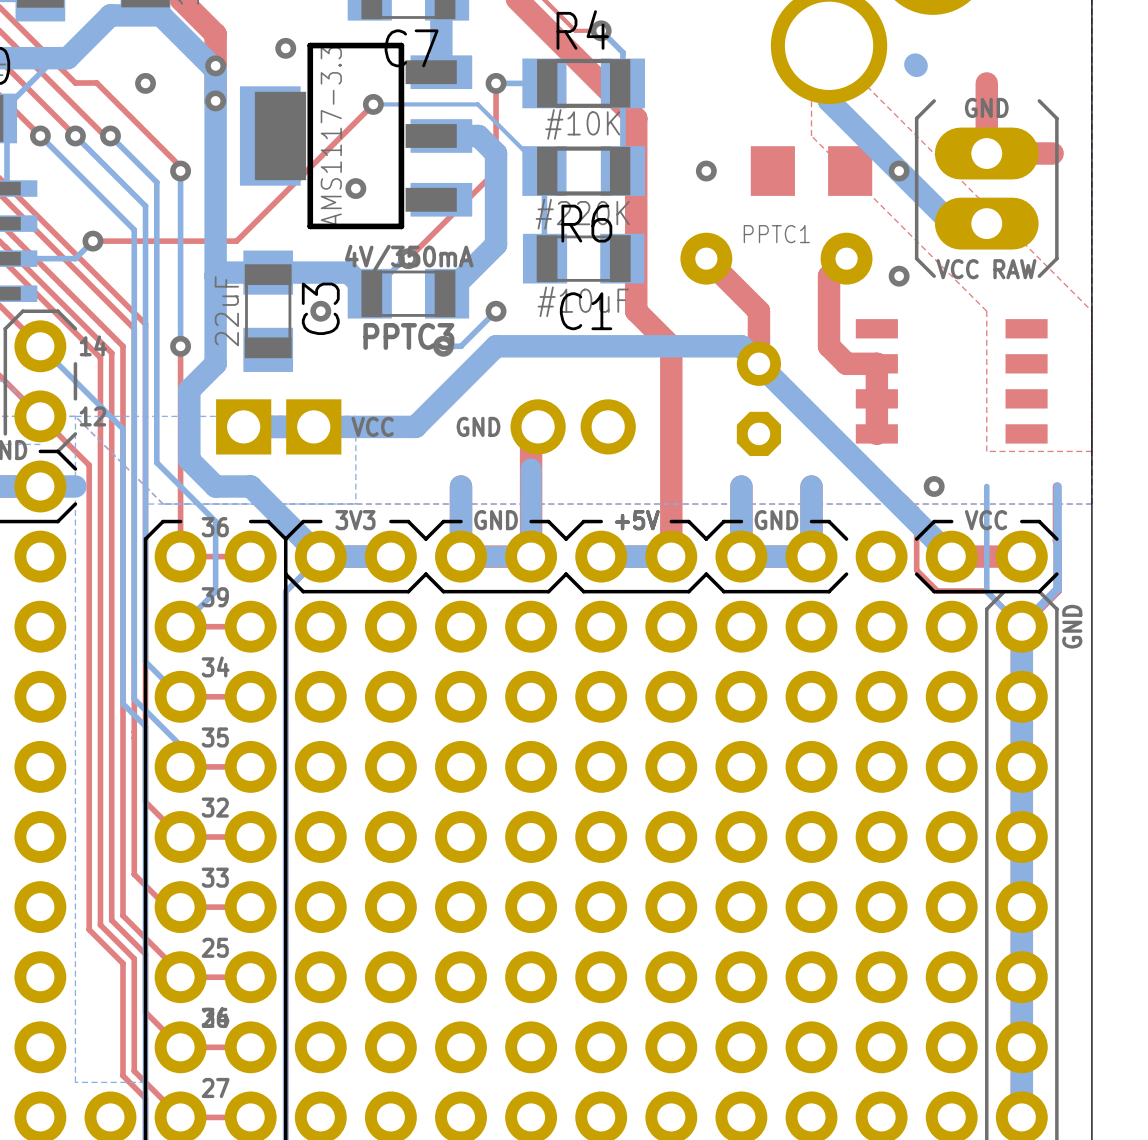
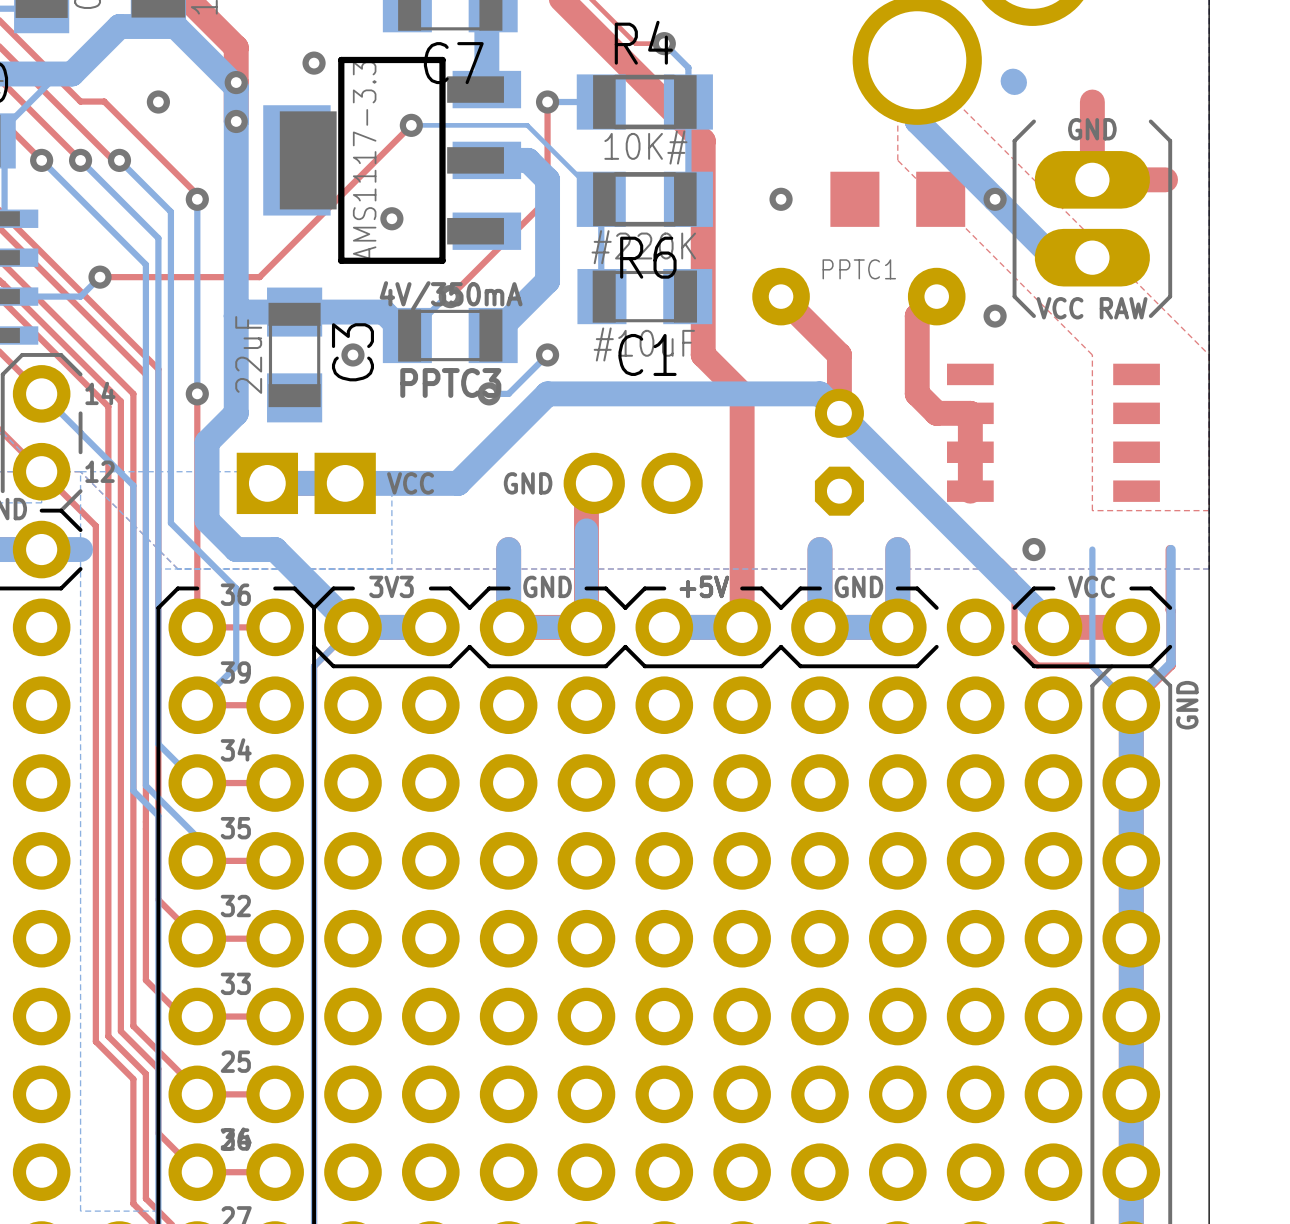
R4 value: #10K (582, 124) -> 10K# (645, 147)

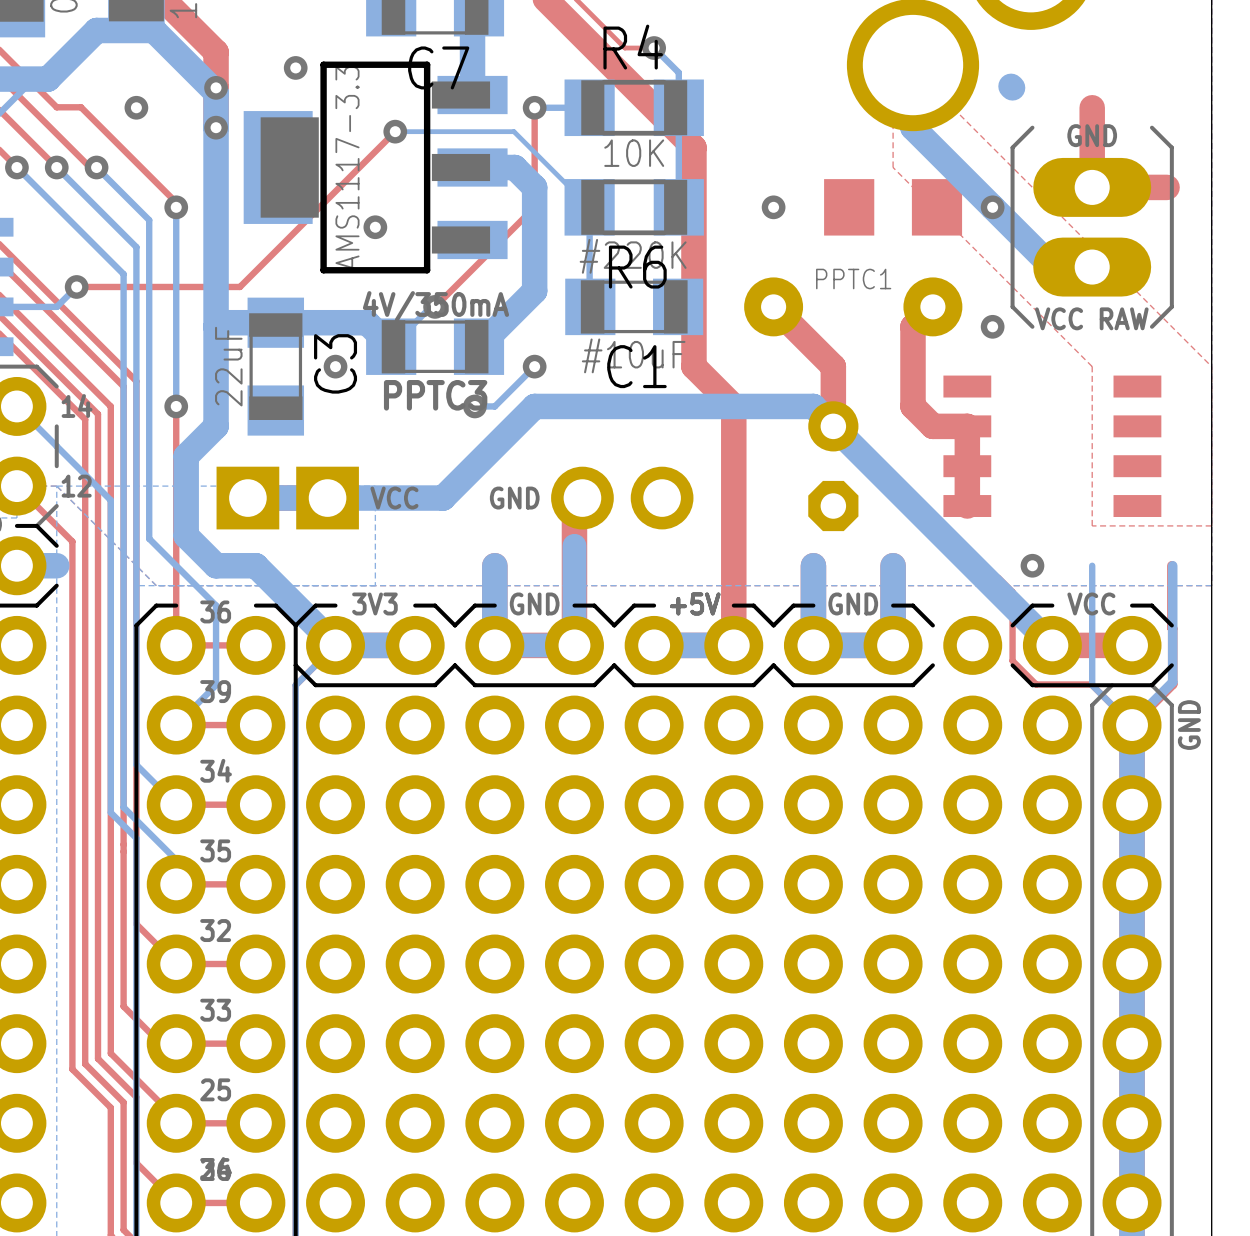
R4 value: 10K# (645, 147) -> 10K (634, 153)

